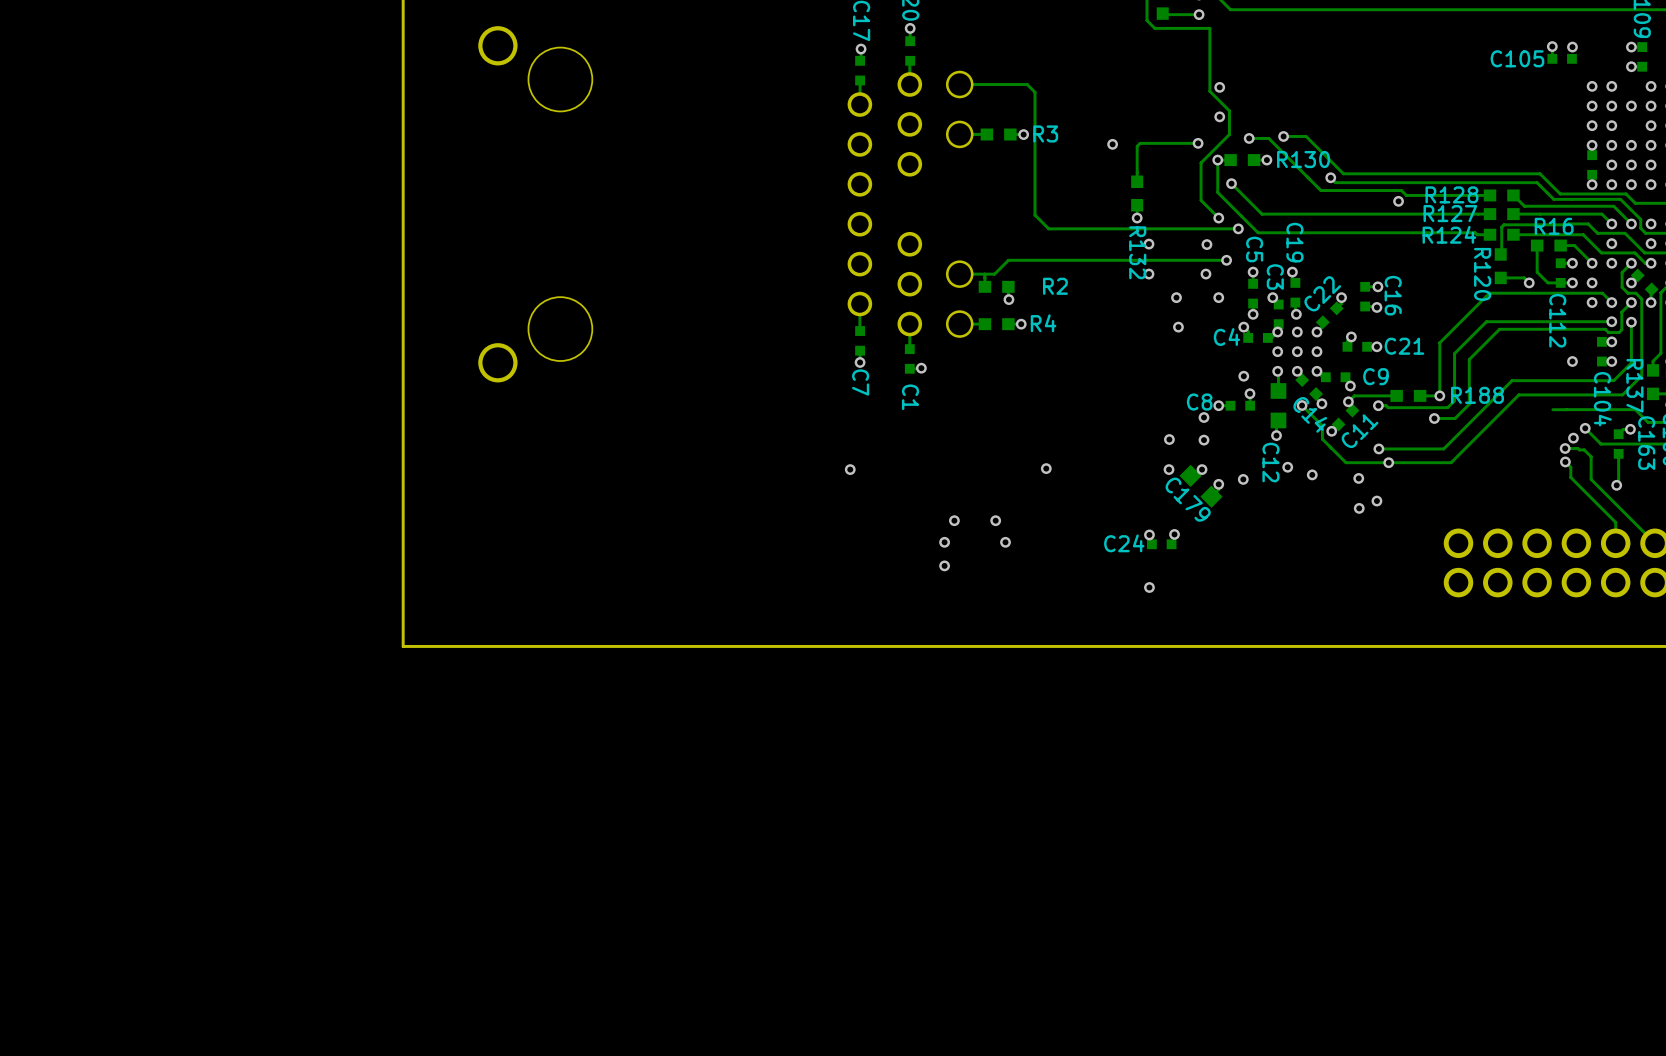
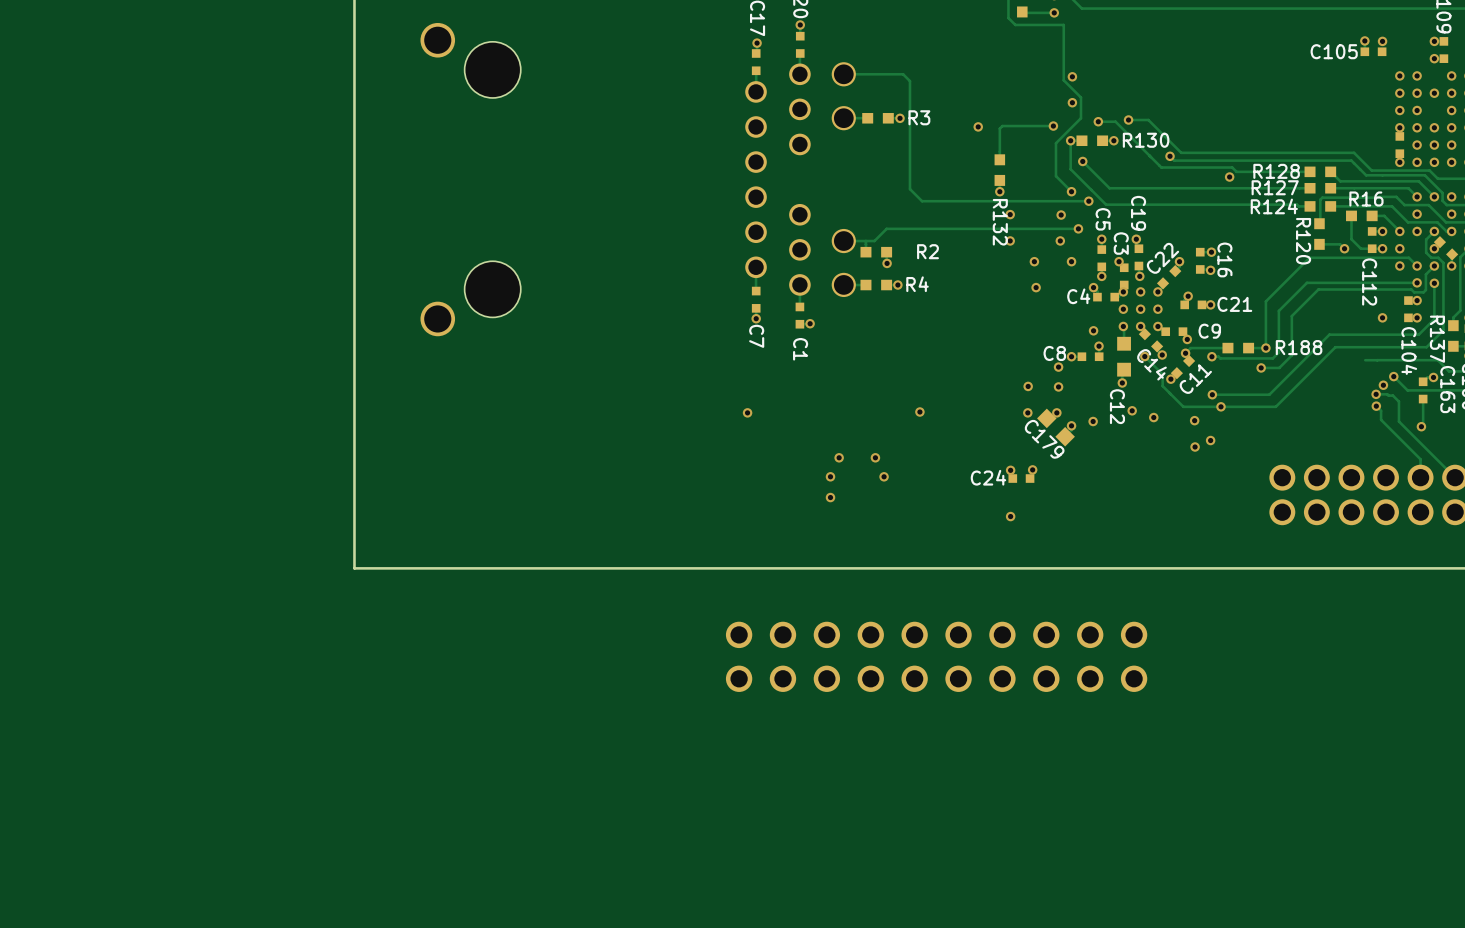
part: none -> (936, 656)

